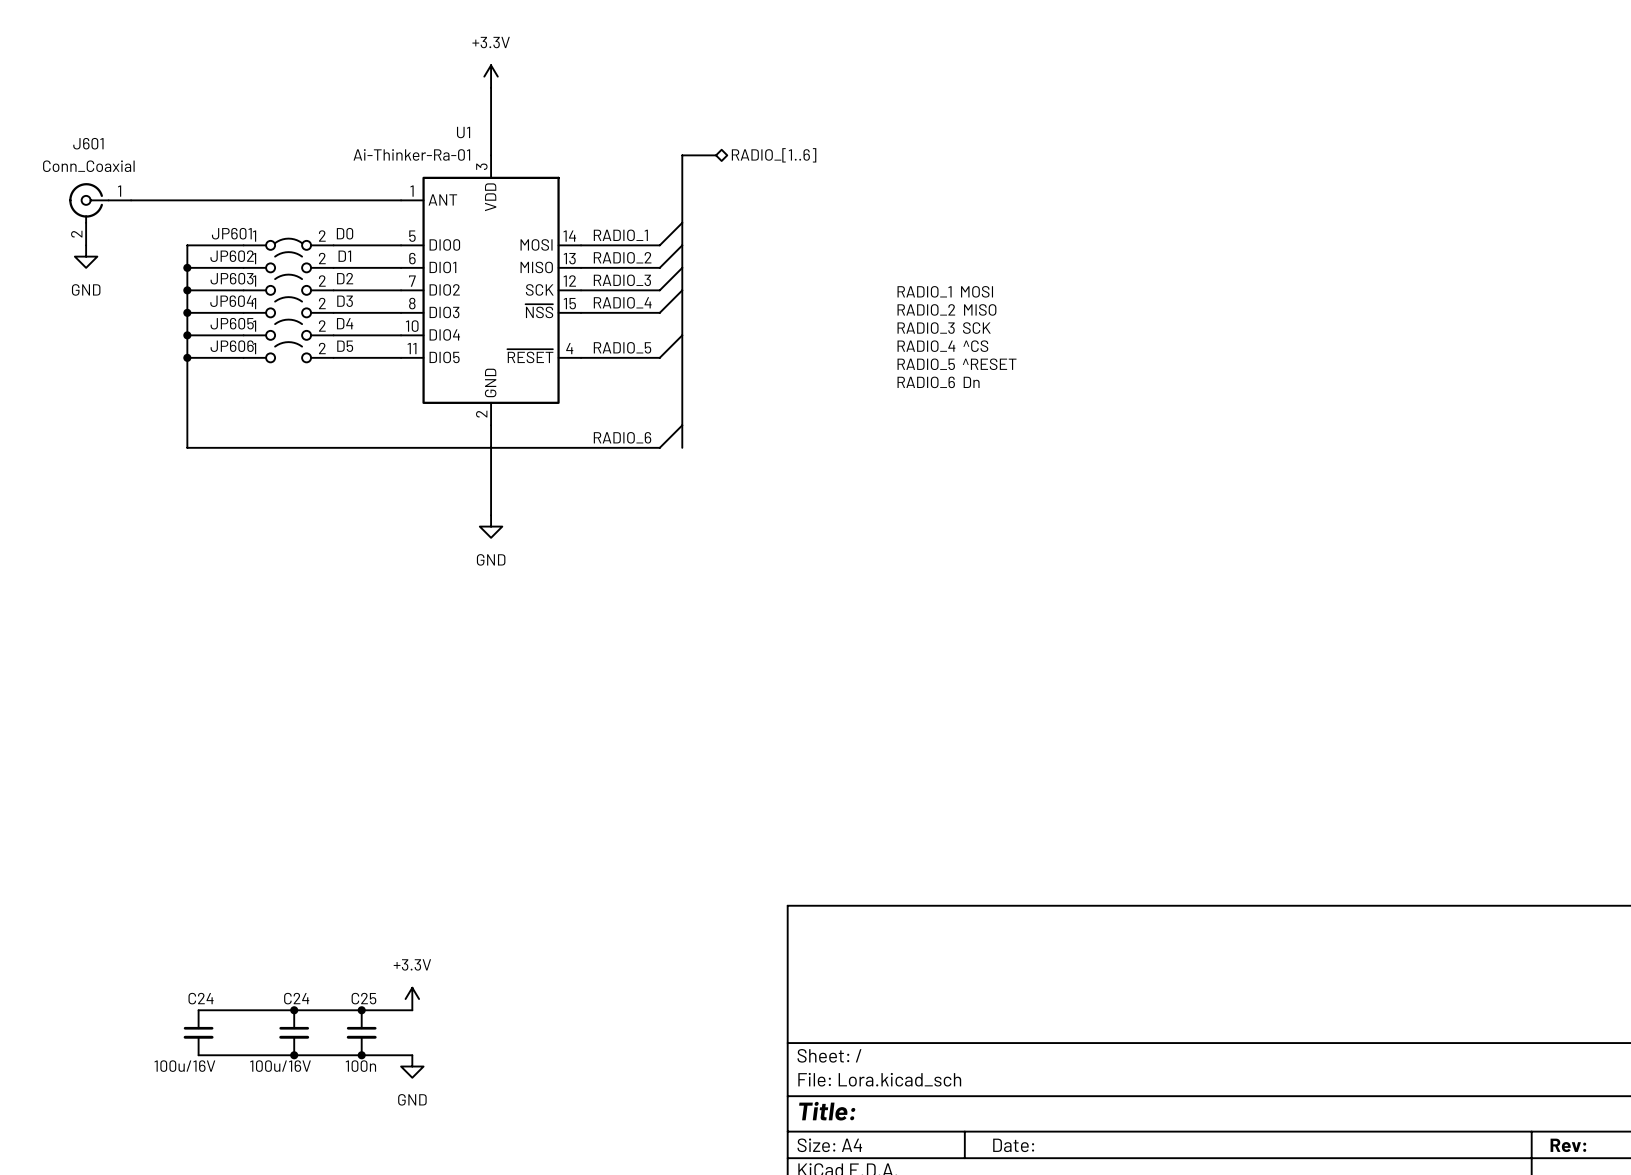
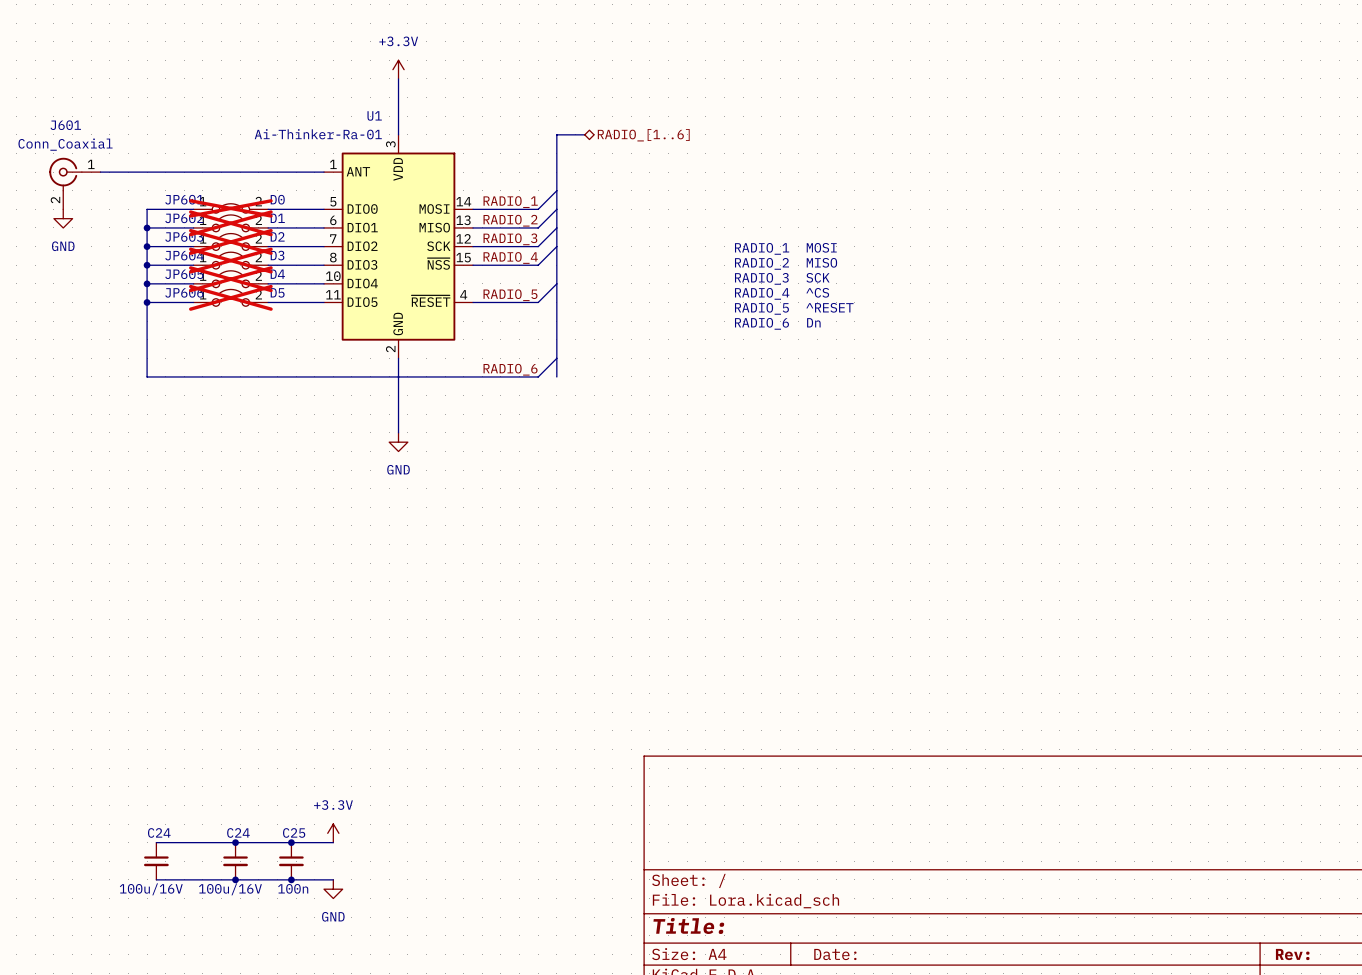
JP601 do-not-place cross: none -> (230, 208)
JP602 do-not-place cross: none -> (230, 223)
JP603 do-not-place cross: none -> (230, 241)
JP604 do-not-place cross: none -> (230, 260)
JP605 do-not-place cross: none -> (230, 279)
JP606 do-not-place cross: none -> (230, 297)

